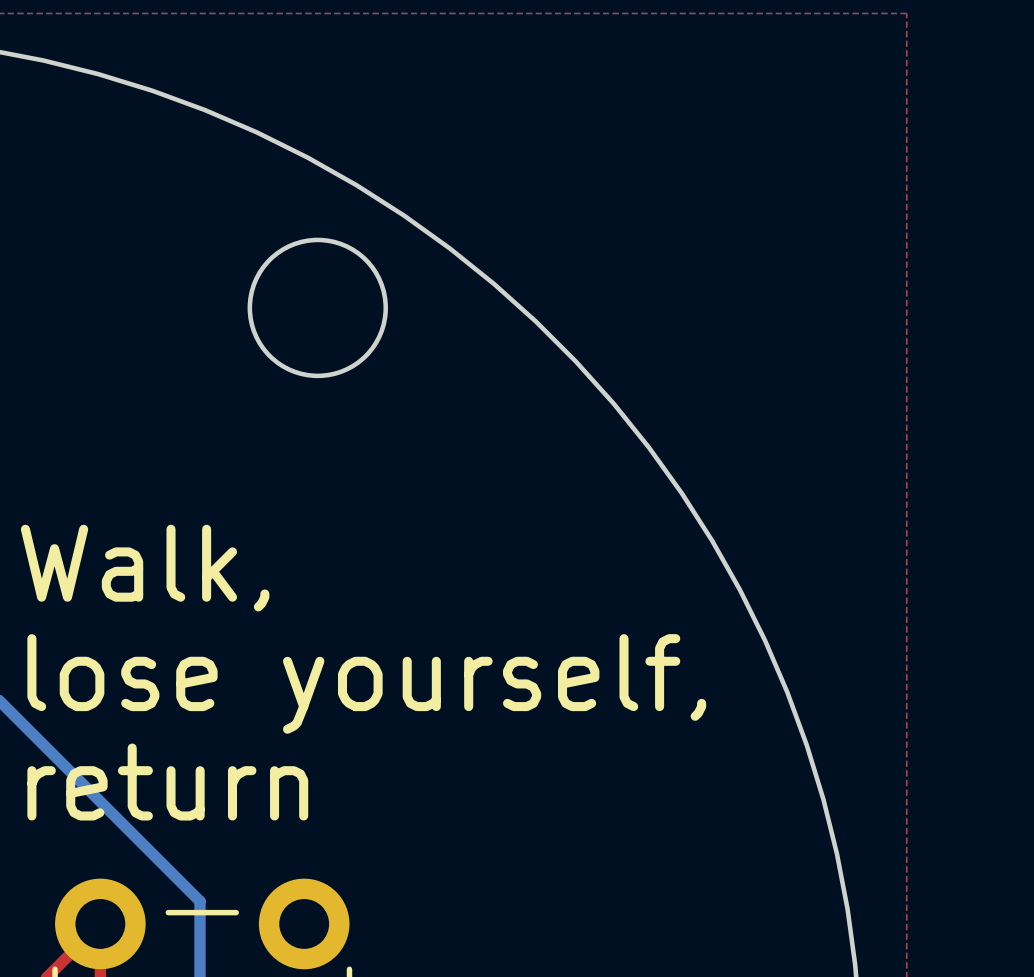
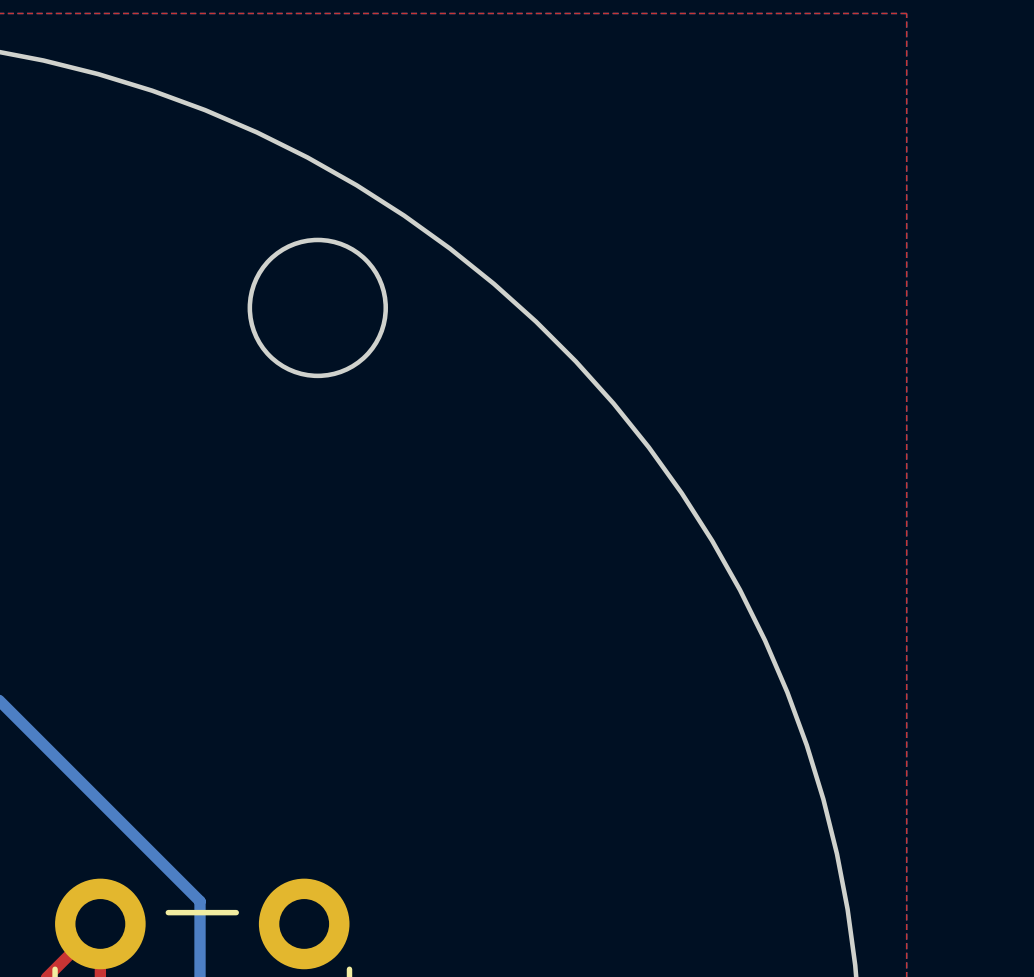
text: Walk, (145, 568) -> none
text: lose yourself, (366, 683) -> none
text: return (167, 782) -> none

